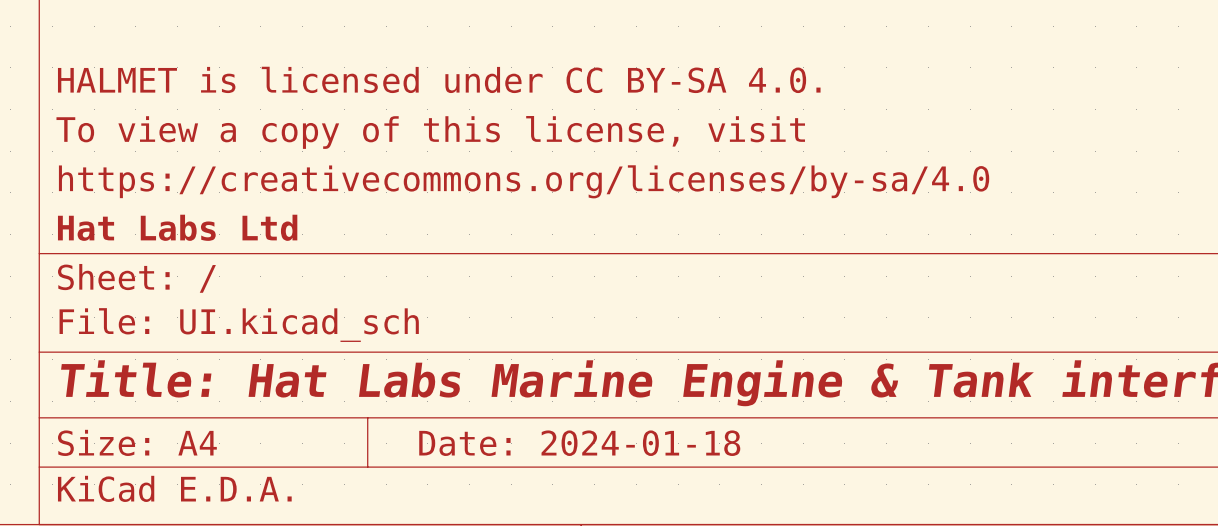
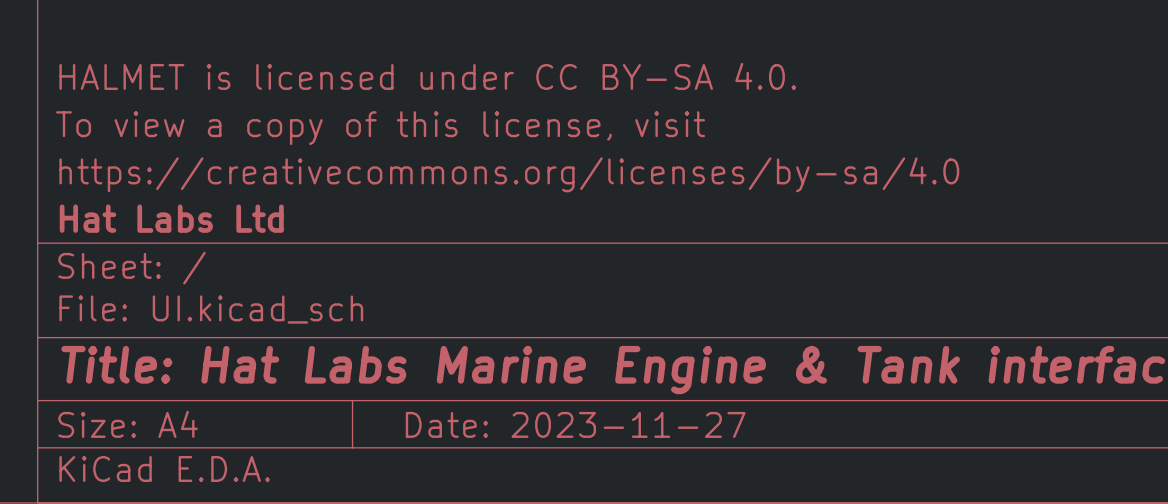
title block: Date: 2024-01-18 (579, 443) -> Date: 2023-11-27 (575, 424)

